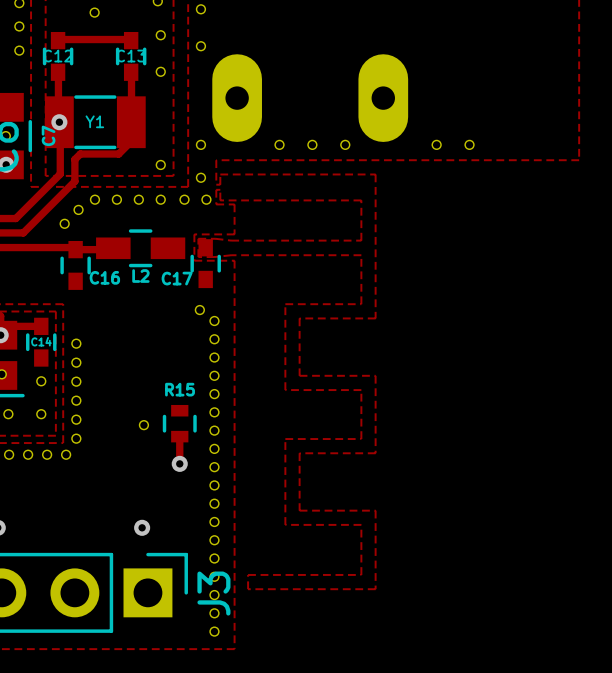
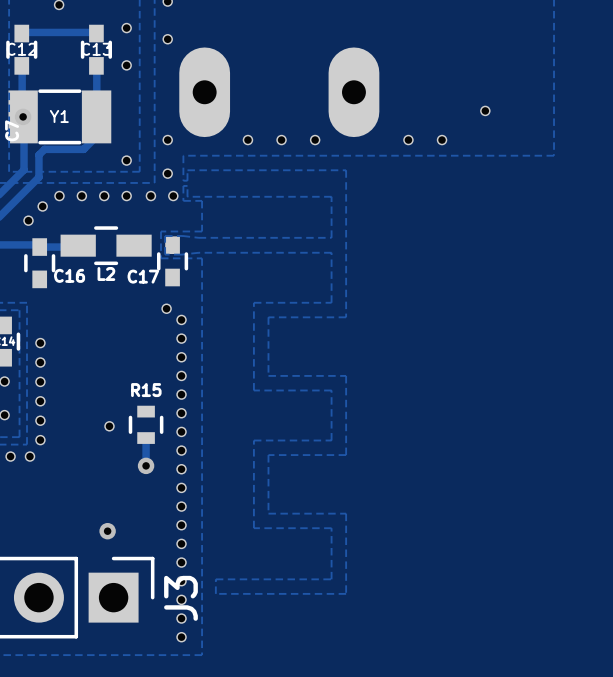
part: none -> (485, 110)

